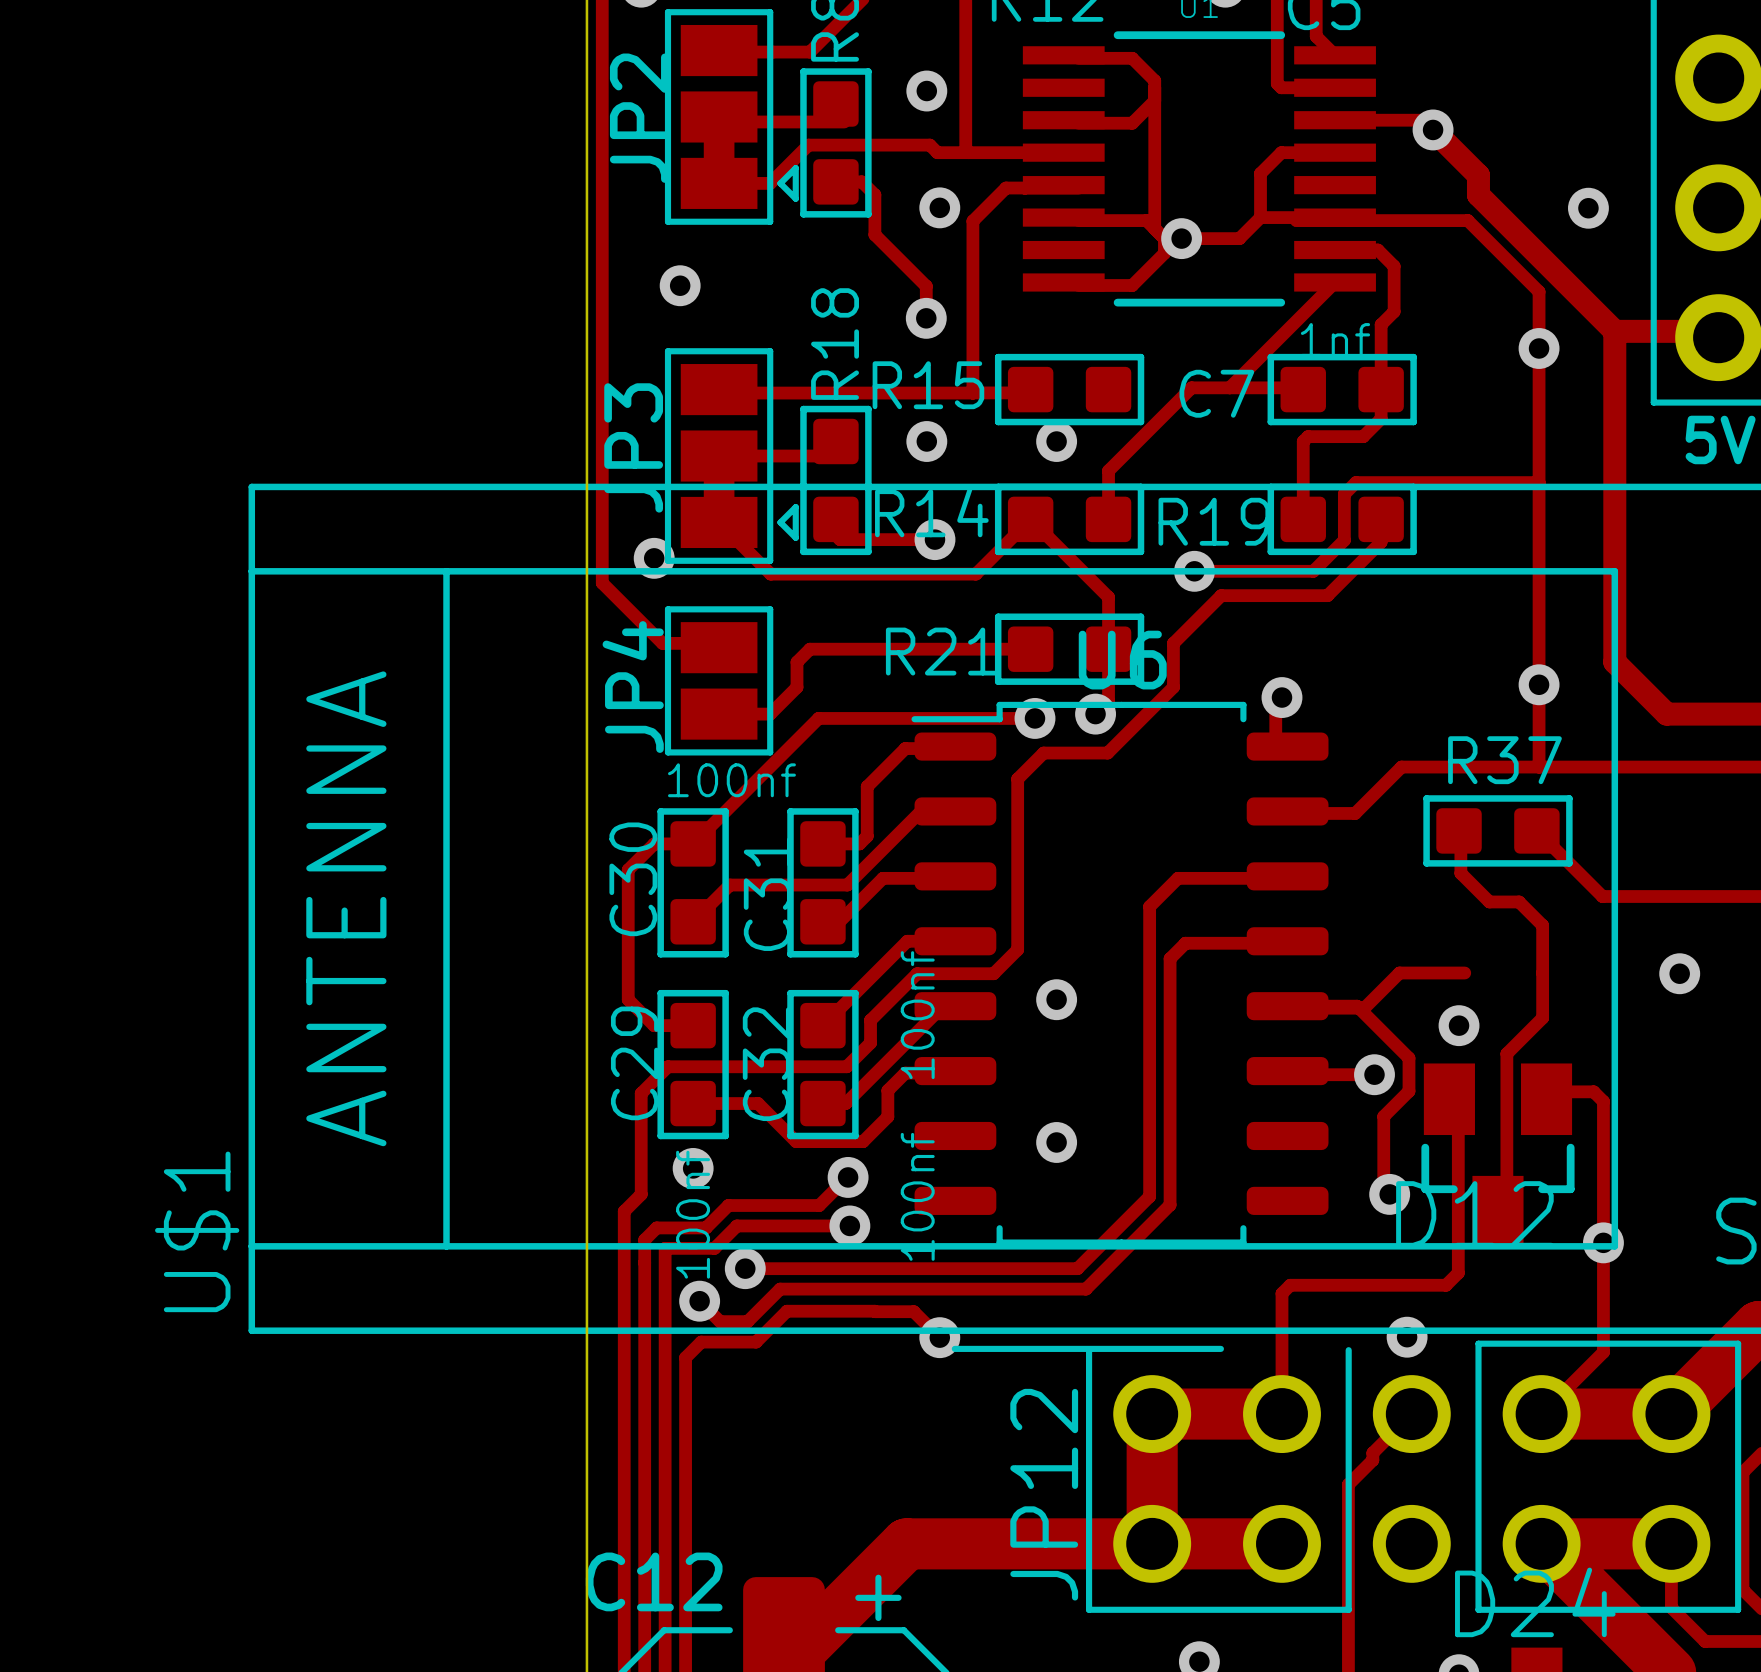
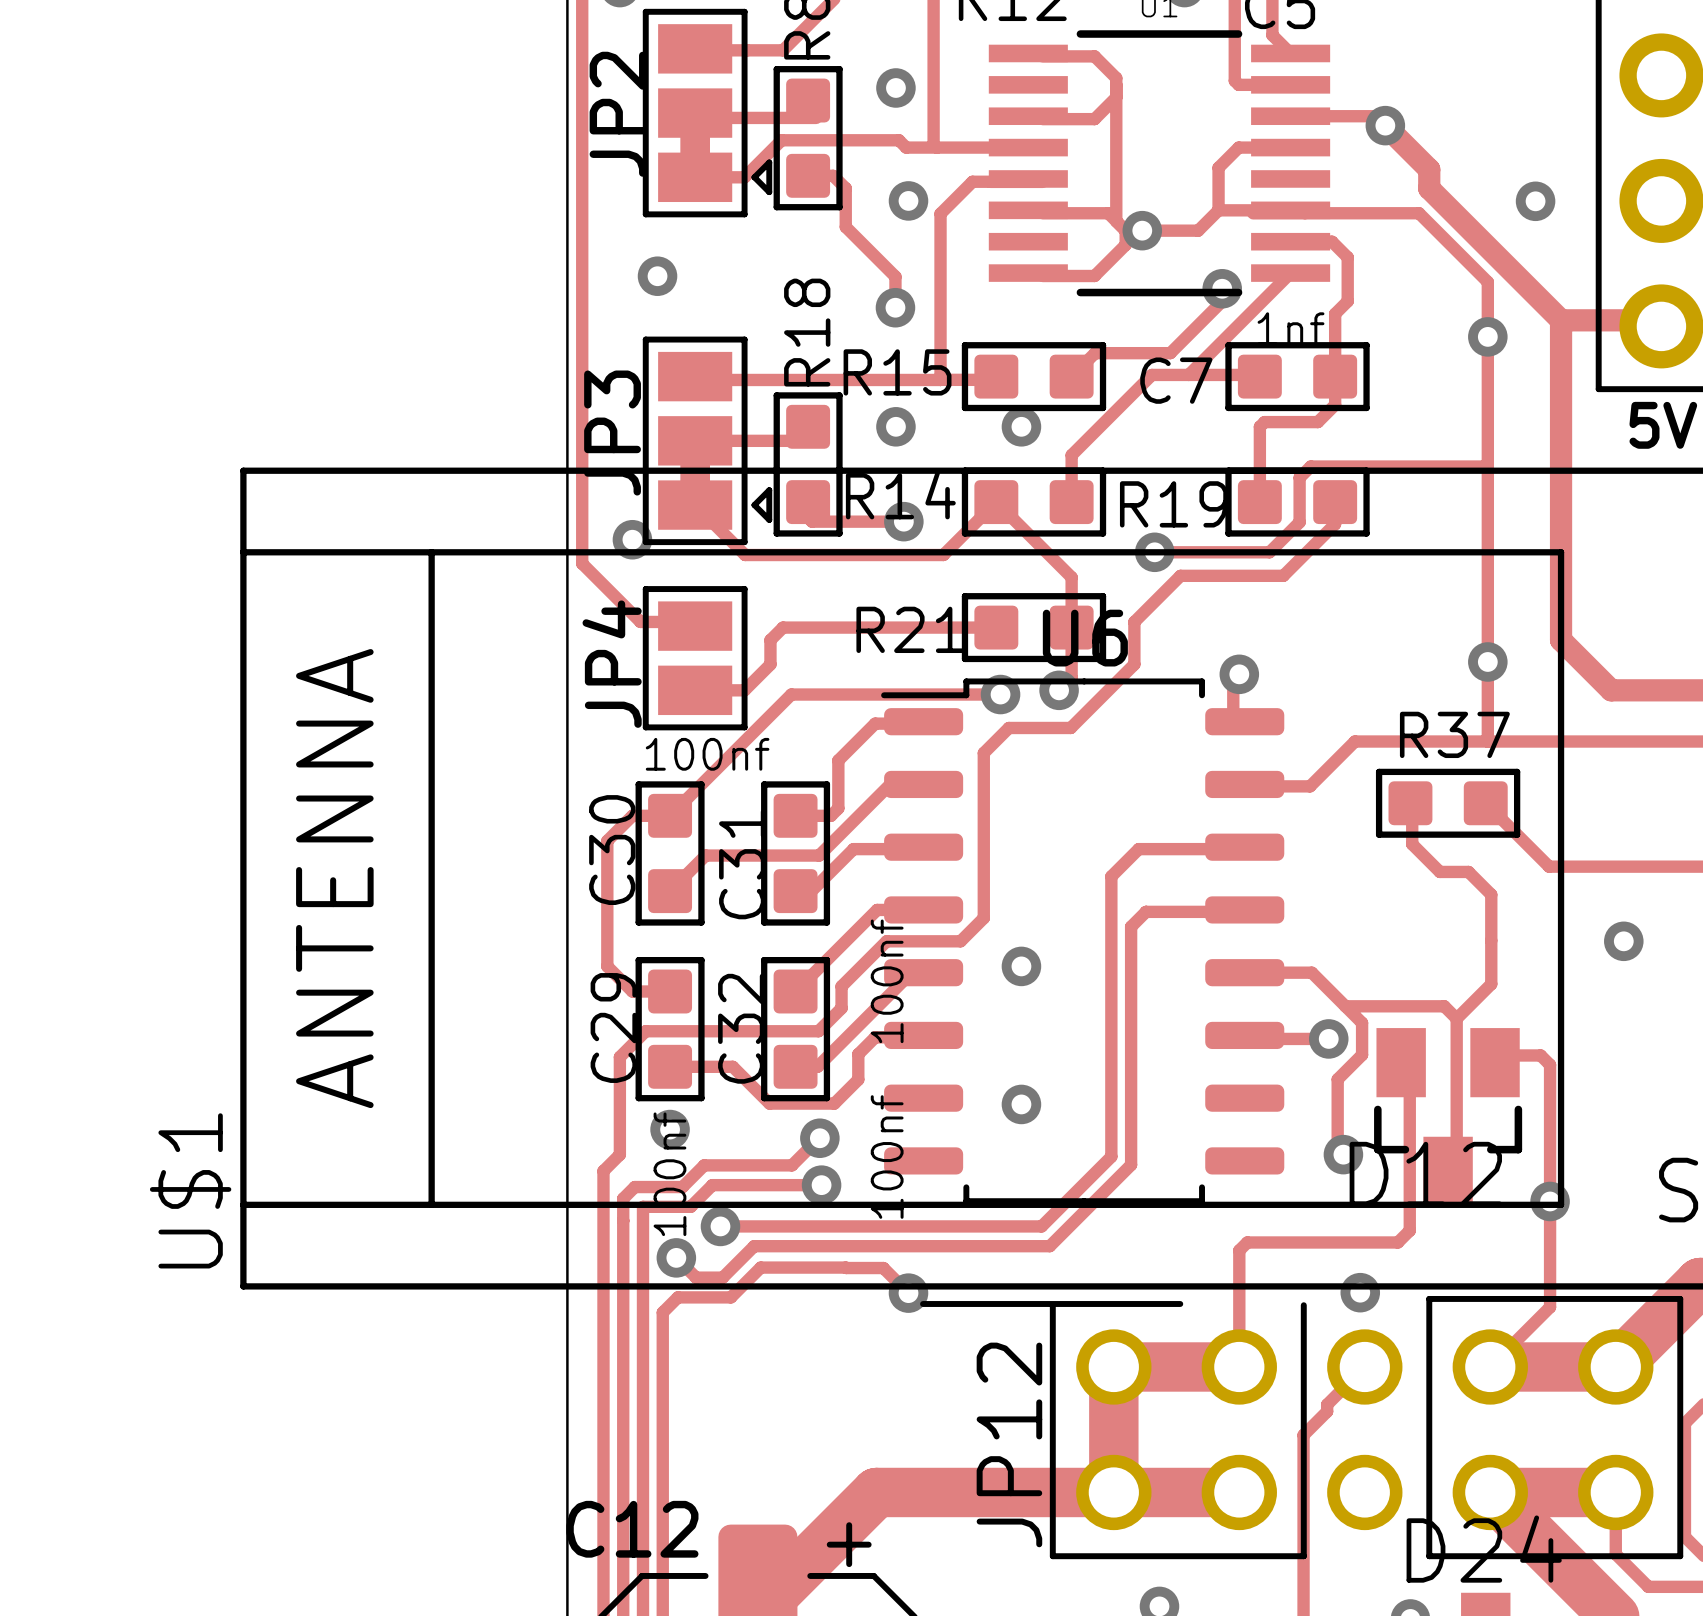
track: none -> (1222, 288) (1222, 301) (1170, 353) (1095, 353) (1071, 376)
via: none -> (1222, 288)
track: (1464, 973) (1399, 973) (1364, 1008) (1275, 1008) -> none
via: (1459, 1025) -> none
track: none -> (1345, 1006) (1444, 1006) (1456, 1018)

